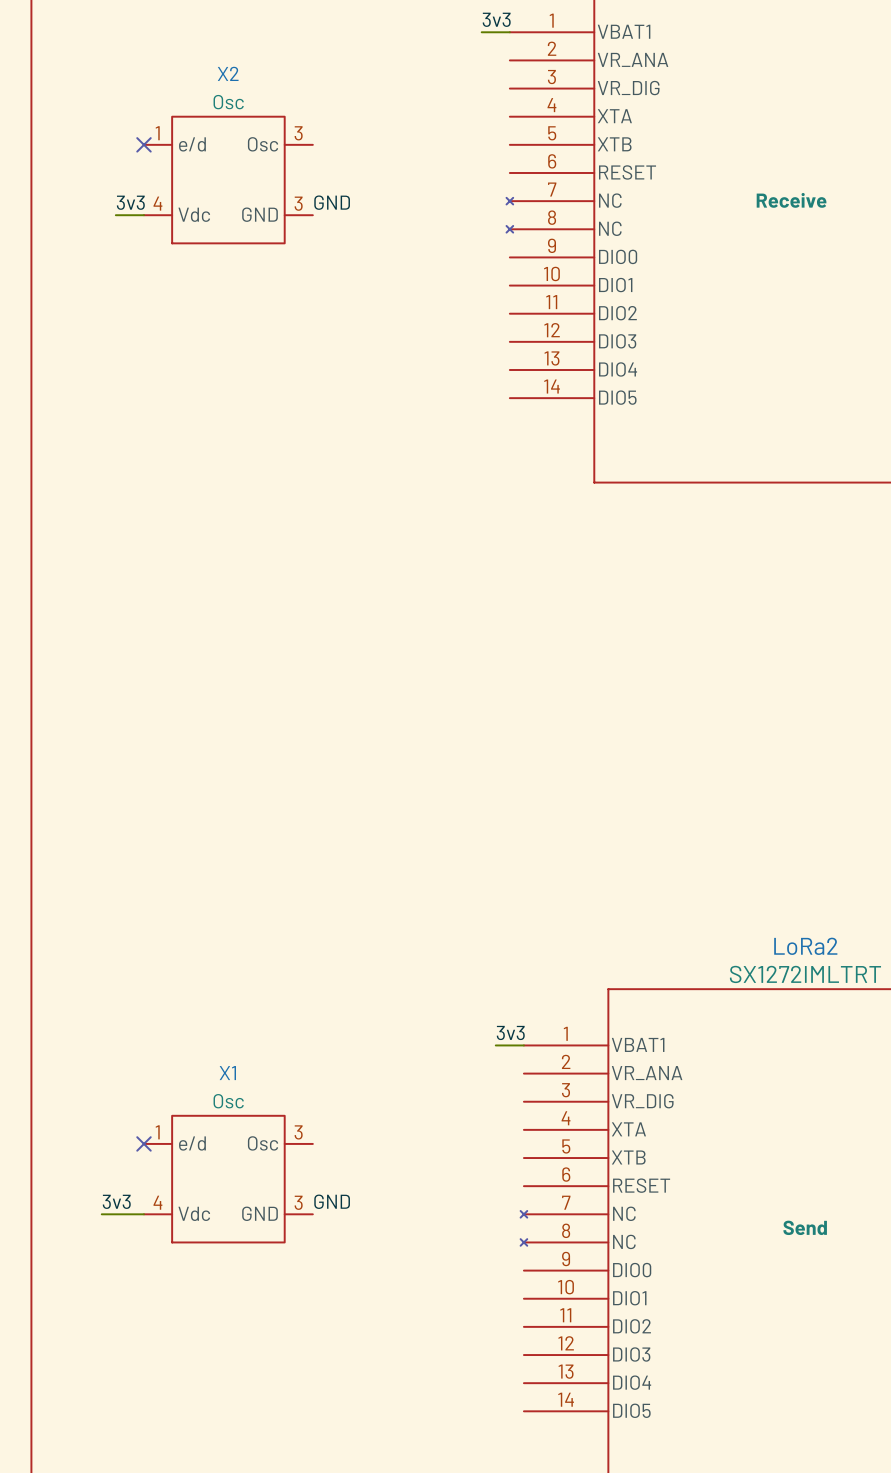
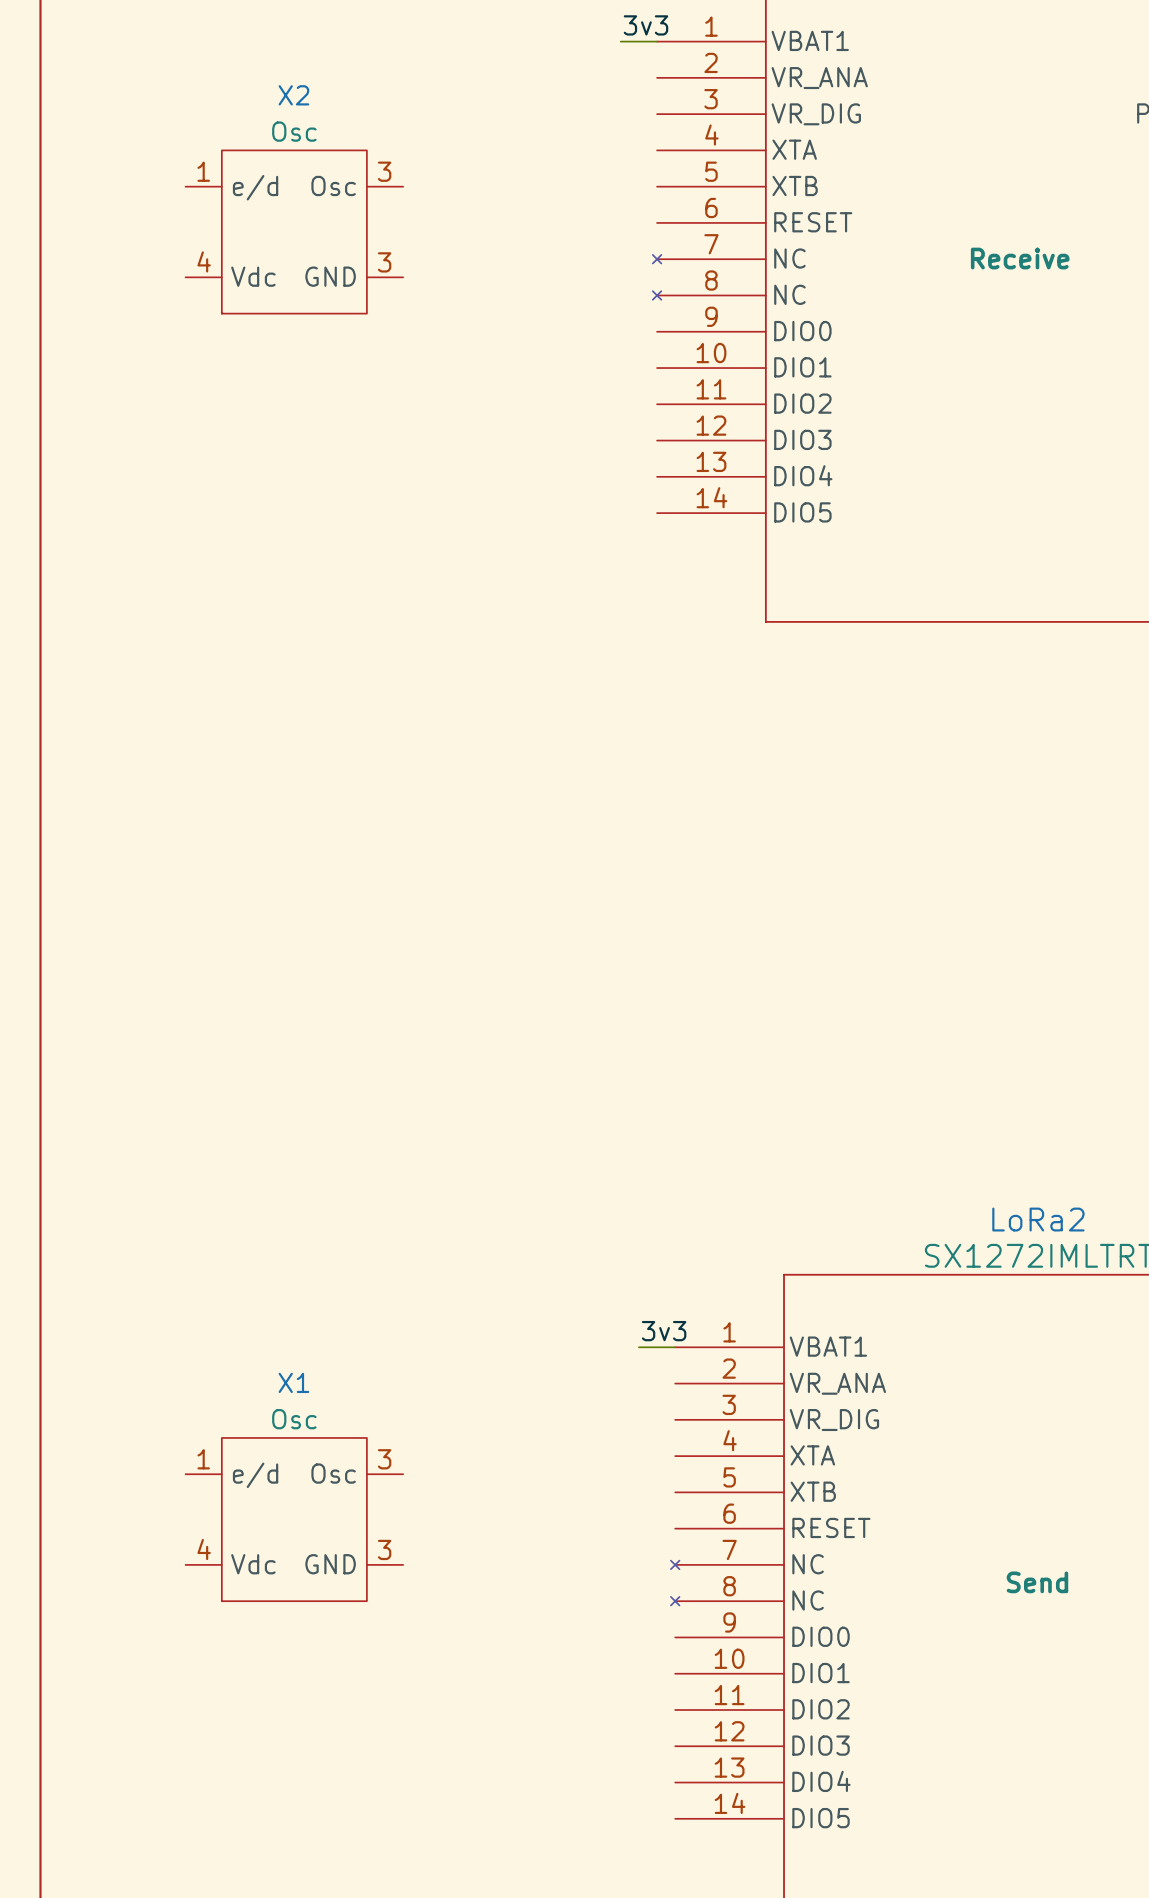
no-connect mark: (143, 144) -> none
label: 3v3 (130, 202) -> none
label: GND (332, 202) -> none
wire: (115, 215) (143, 215) -> none
no-connect mark: (143, 1143) -> none
label: 3v3 (116, 1201) -> none
label: GND (332, 1201) -> none
wire: (101, 1214) (143, 1214) -> none

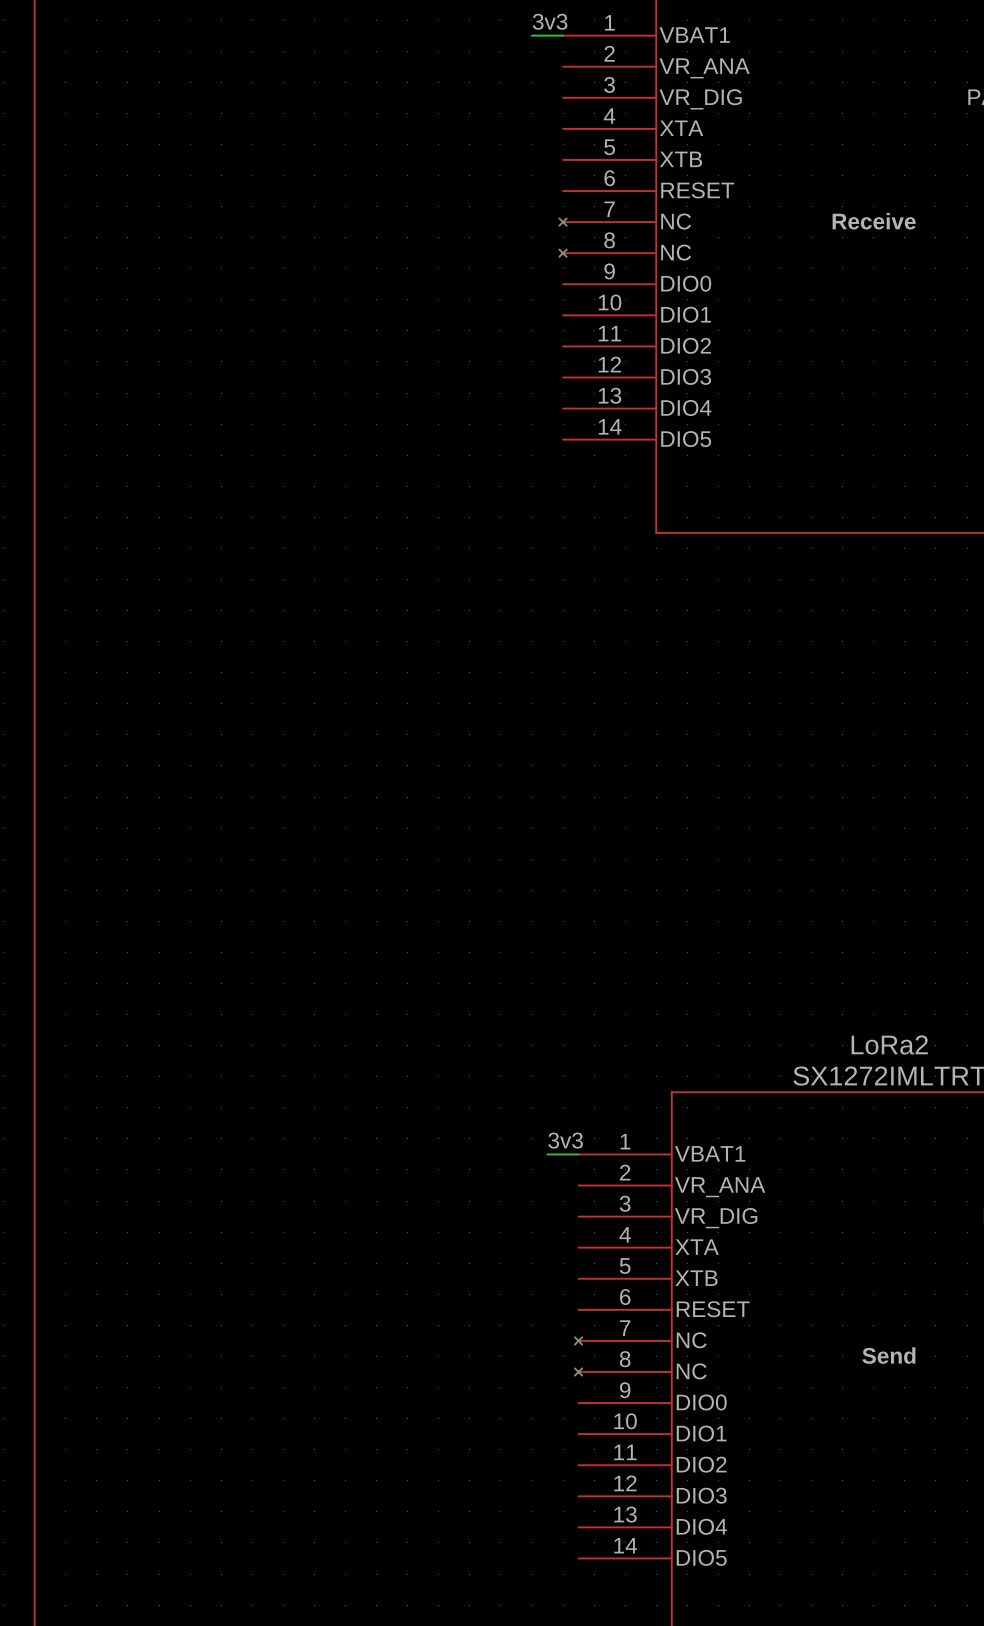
X2: Osc (294, 232) -> none
X1: Osc (294, 1519) -> none

